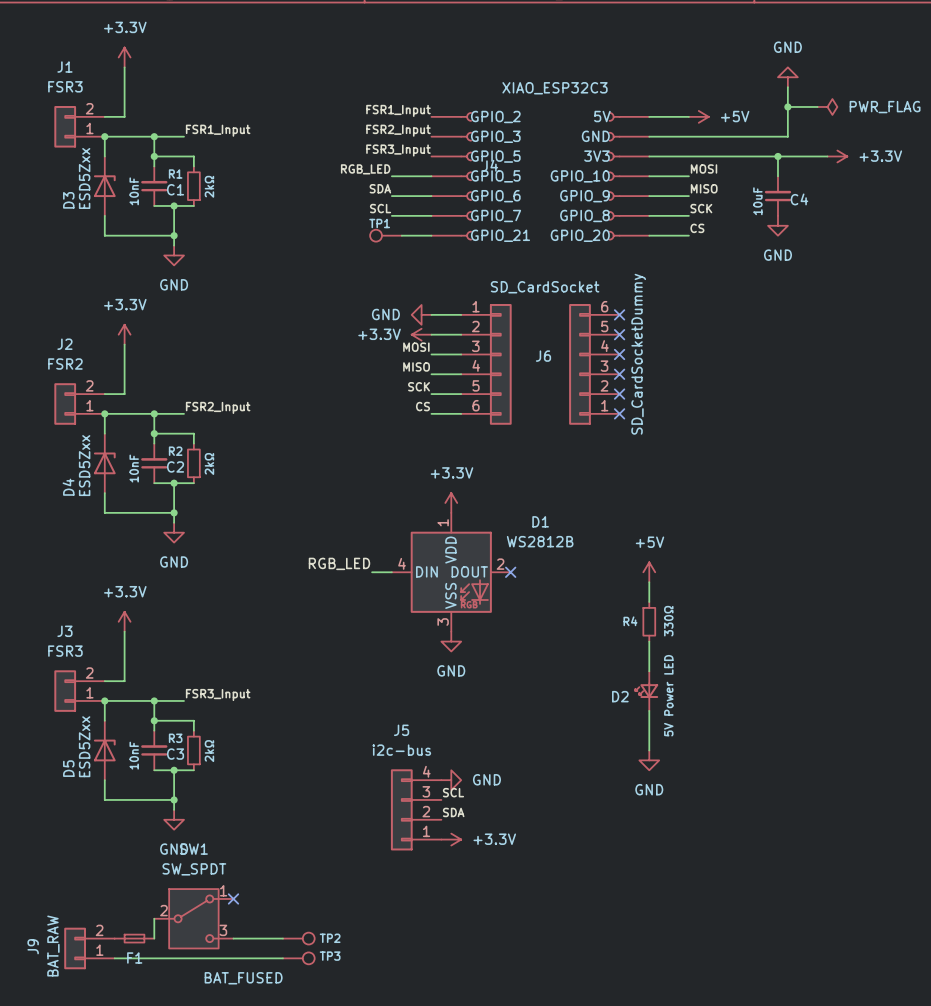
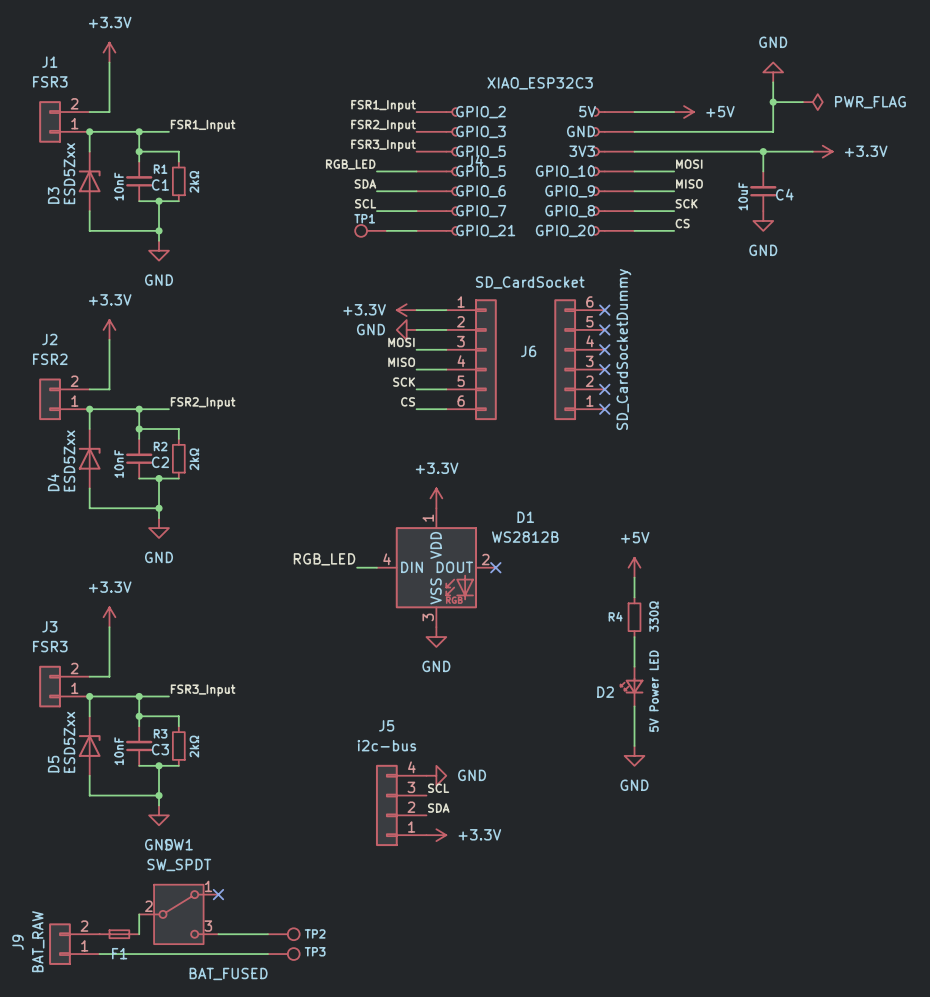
power symbol: GND (421, 314) -> +3.3V (406, 310)
power symbol: +3.3V (421, 334) -> GND (406, 329)

